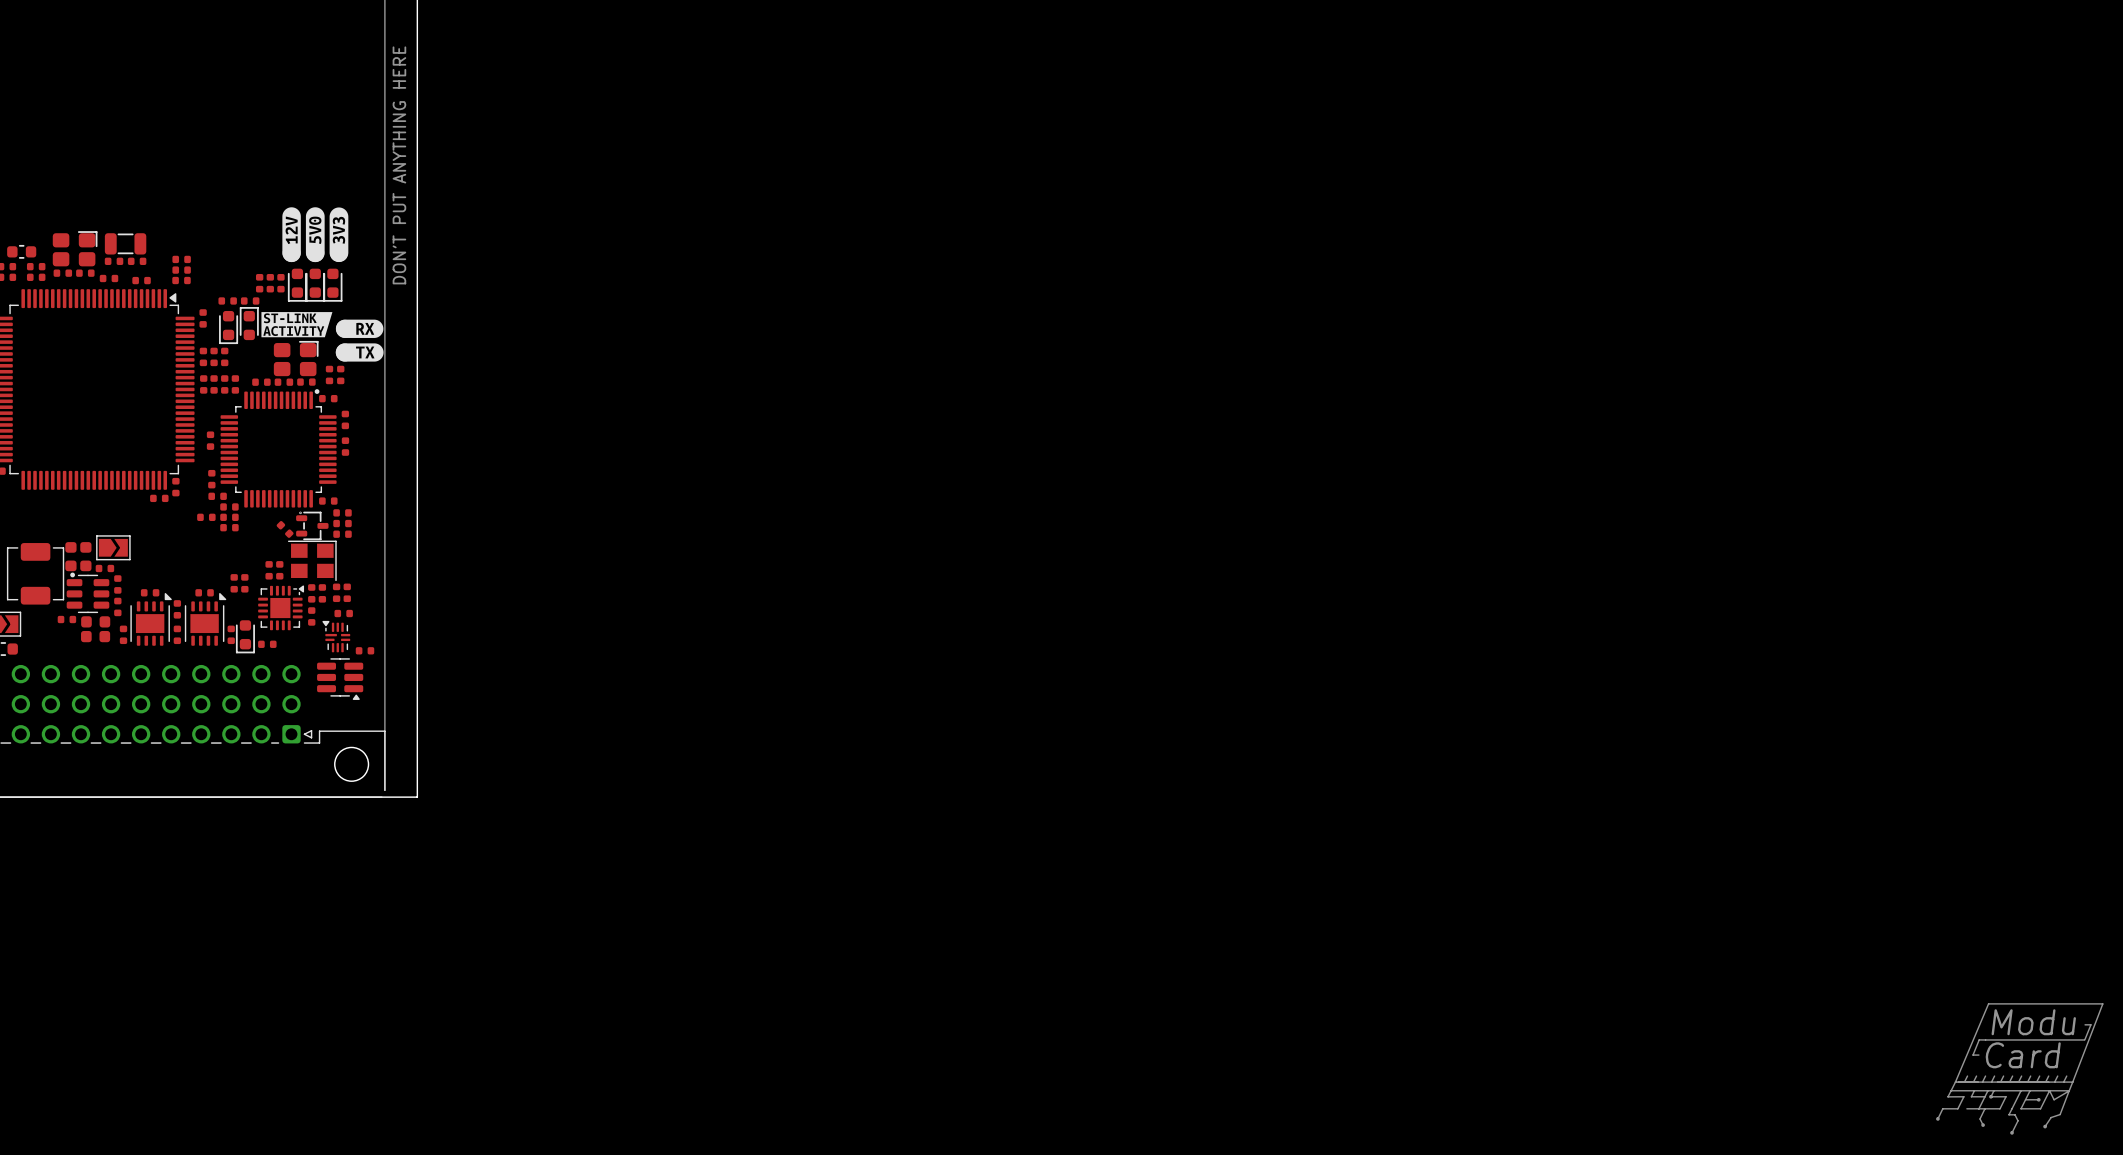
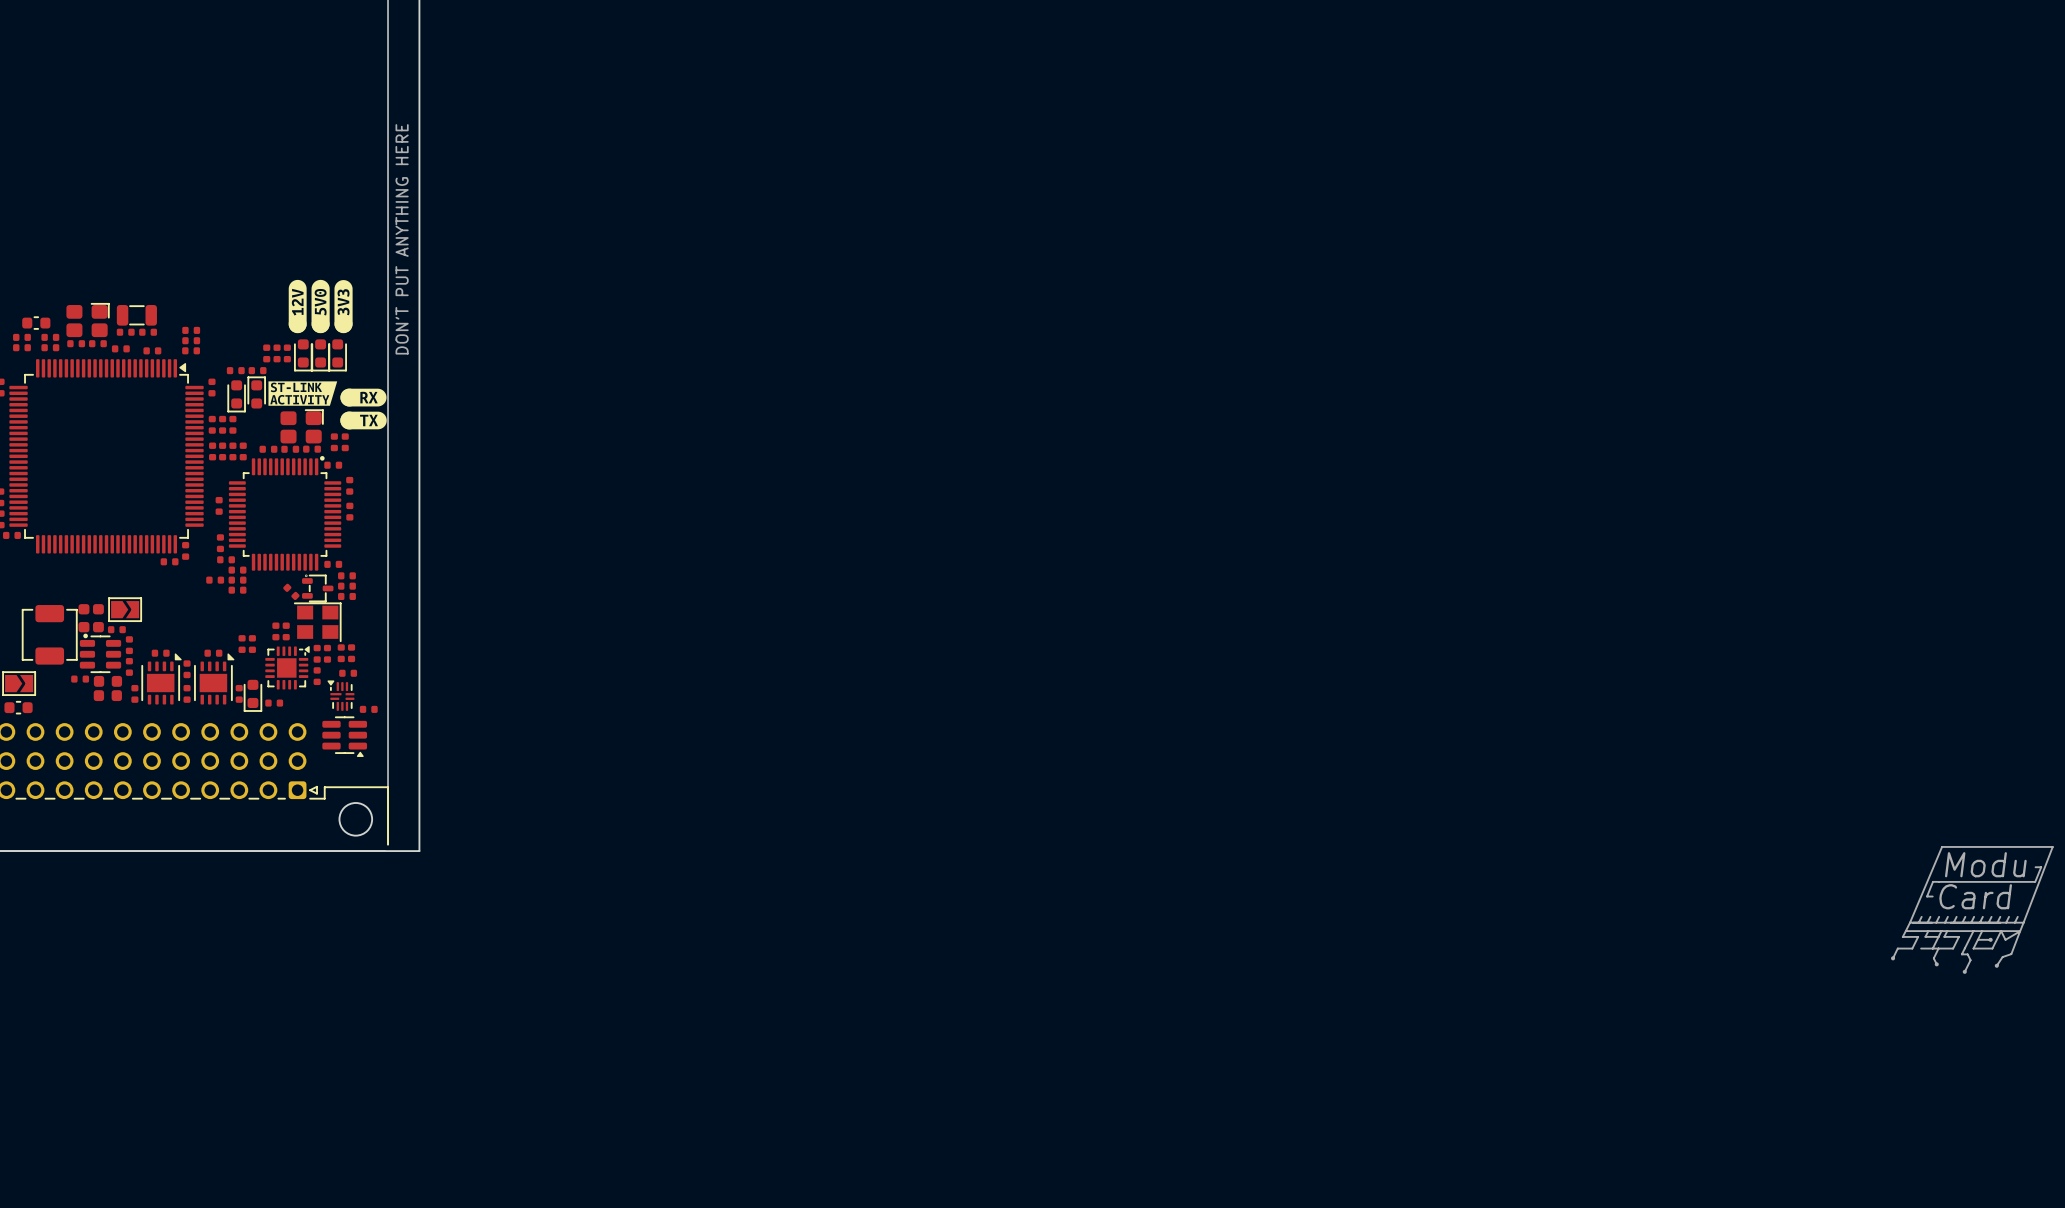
line: none -> (1947, 931) (1944, 936) (1958, 936) (1953, 948)
drawing: none -> [1989, 938, 1993, 942]
line: none -> (1921, 948) (1953, 948)
drawing: none -> [1891, 956, 1895, 961]
drawing: none -> [1935, 962, 1939, 966]
drawing: none -> [1995, 964, 1999, 968]
drawing: none -> [1963, 970, 1967, 974]
text position: Modu (2033, 1022) -> Modu (1985, 864)
line: (2085, 1024) (2090, 1024) (2084, 1039) -> (2035, 867) (2041, 867) (2035, 881)
line: (2084, 1039) (1979, 1039) (1973, 1055) (1978, 1055) -> (2034, 881) (1933, 881) (1927, 896) (1932, 896)
text position: Card (2023, 1055) -> Card (1975, 896)
line: (1967, 1076) (1964, 1082) -> (1921, 916) (1918, 922)
line: (1976, 1076) (1973, 1082) -> (1930, 916) (1927, 922)
line: (1985, 1076) (1982, 1082) -> (1939, 916) (1936, 922)
line: (1994, 1076) (1991, 1082) -> (1947, 916) (1944, 922)
line: (2003, 1076) (2000, 1082) -> (1956, 916) (1953, 922)
line: (2012, 1076) (2009, 1082) -> (1965, 916) (1962, 922)
line: (2021, 1076) (2018, 1082) -> (1974, 916) (1971, 922)
line: (2030, 1076) (2027, 1082) -> (1982, 916) (1979, 922)
line: (2039, 1076) (2036, 1082) -> (1991, 916) (1988, 922)
line: (2048, 1076) (2045, 1082) -> (2000, 916) (1997, 922)
line: (2057, 1076) (2054, 1082) -> (2009, 916) (2006, 922)
line: (2066, 1076) (2063, 1082) -> (2017, 916) (2014, 922)
line: (1955, 1082) (2072, 1082) -> (1910, 922) (2023, 922)
line: (1955, 1082) (1988, 1003) (2102, 1003) (2072, 1082) -> (1910, 922) (1942, 846) (2052, 846) (2023, 922)
line: (1955, 1082) (1951, 1090) -> (1910, 922) (1905, 931)
line: (2072, 1082) (2069, 1090) (1951, 1090) -> (2023, 922) (2020, 931) (1905, 931)
line: (1951, 1090) (1947, 1096) (1963, 1096) (1957, 1108) (1942, 1108) (1937, 1118) -> (1905, 931) (1902, 936) (1918, 936) (1912, 948) (1897, 948) (1893, 958)
line: (1974, 1090) (1971, 1096) (1984, 1096) -> (1928, 931) (1925, 936) (1938, 936)
line: (1987, 1090) (1984, 1096) -> (1941, 931) (1938, 936)
line: (1993, 1090) (1990, 1096) (2005, 1096) (1999, 1108) (1966, 1108) -> none
line: (2021, 1090) (2008, 1114) (2015, 1114) (2018, 1120) (2012, 1132) -> (1973, 931) (1961, 954) (1967, 954) (1970, 960) (1964, 971)
line: (2030, 1090) (2021, 1108) (2040, 1108) (2049, 1090) (2054, 1099) (2069, 1091) (2060, 1114) (2051, 1117) (2045, 1126) -> (1982, 931) (1973, 948) (1992, 948) (2001, 931) (2005, 939) (2020, 931) (2011, 954) (2002, 957) (1996, 965)
drawing: [1989, 1095, 1993, 1099] -> none
line: (1984, 1096) (1978, 1108) -> (1938, 936) (1932, 948)
drawing: [2037, 1098, 2041, 1102] -> none
line: (2025, 1099) (2038, 1099) -> (1977, 939) (1990, 939)
line: (1984, 1108) (1980, 1118) -> (1938, 948) (1933, 958)
drawing: [1936, 1117, 1940, 1121] -> none
line: (1980, 1119) (1983, 1125) -> (1933, 958) (1936, 964)
drawing: [1981, 1123, 1985, 1127] -> none
drawing: [2043, 1124, 2047, 1129] -> none
drawing: [2010, 1131, 2014, 1135] -> none

